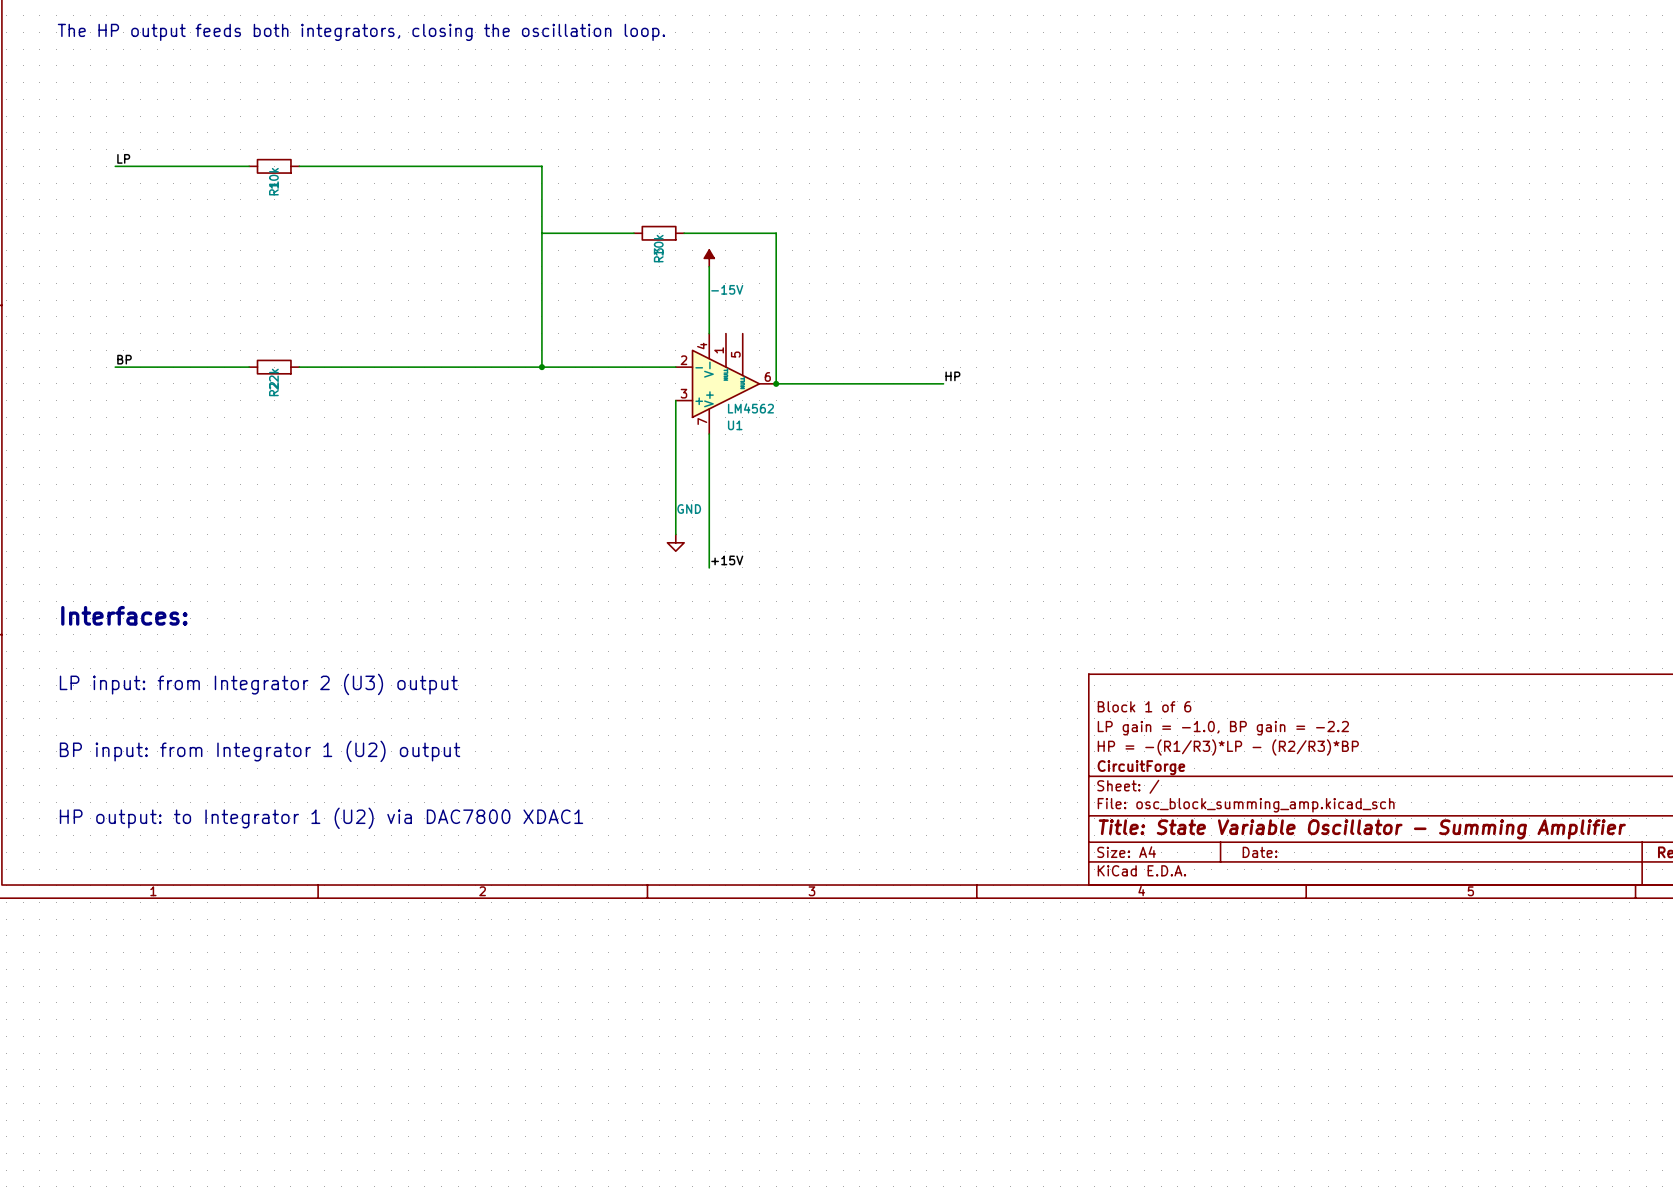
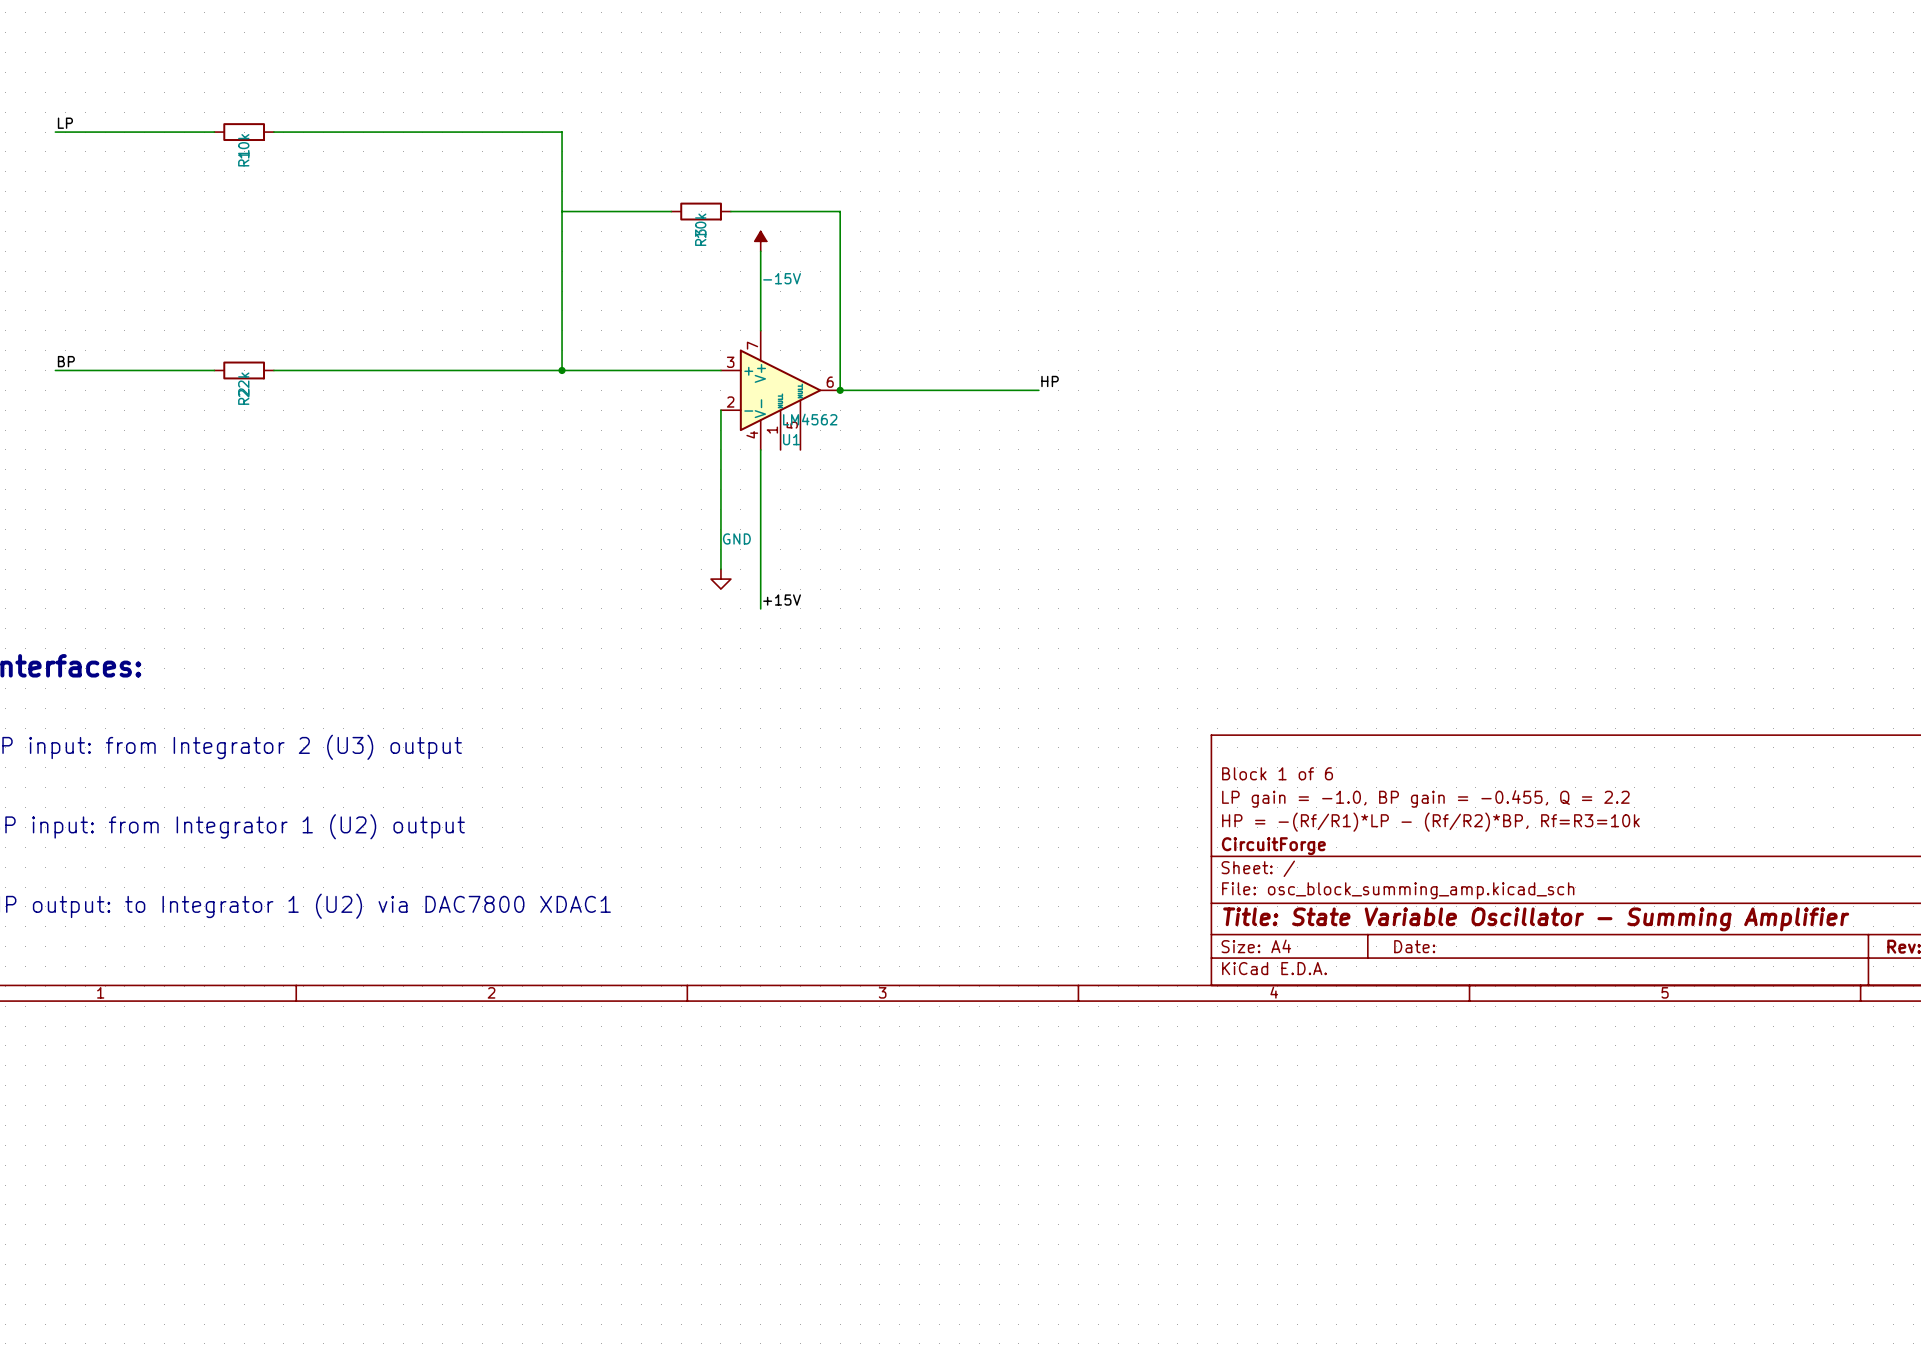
U1 flip: as is (725, 383) -> up-down (780, 390)
title block: LP gain = -1.0, BP gain = -2.2 (1223, 728) -> LP gain = -1.0, BP gain = -0.455, Q = 2.2 (1425, 798)
title block: HP = -(R1/R3)*LP - (R2/R3)*BP (1228, 747) -> HP = -(Rf/R1)*LP - (Rf/R2)*BP, Rf=R3=10k (1430, 822)

